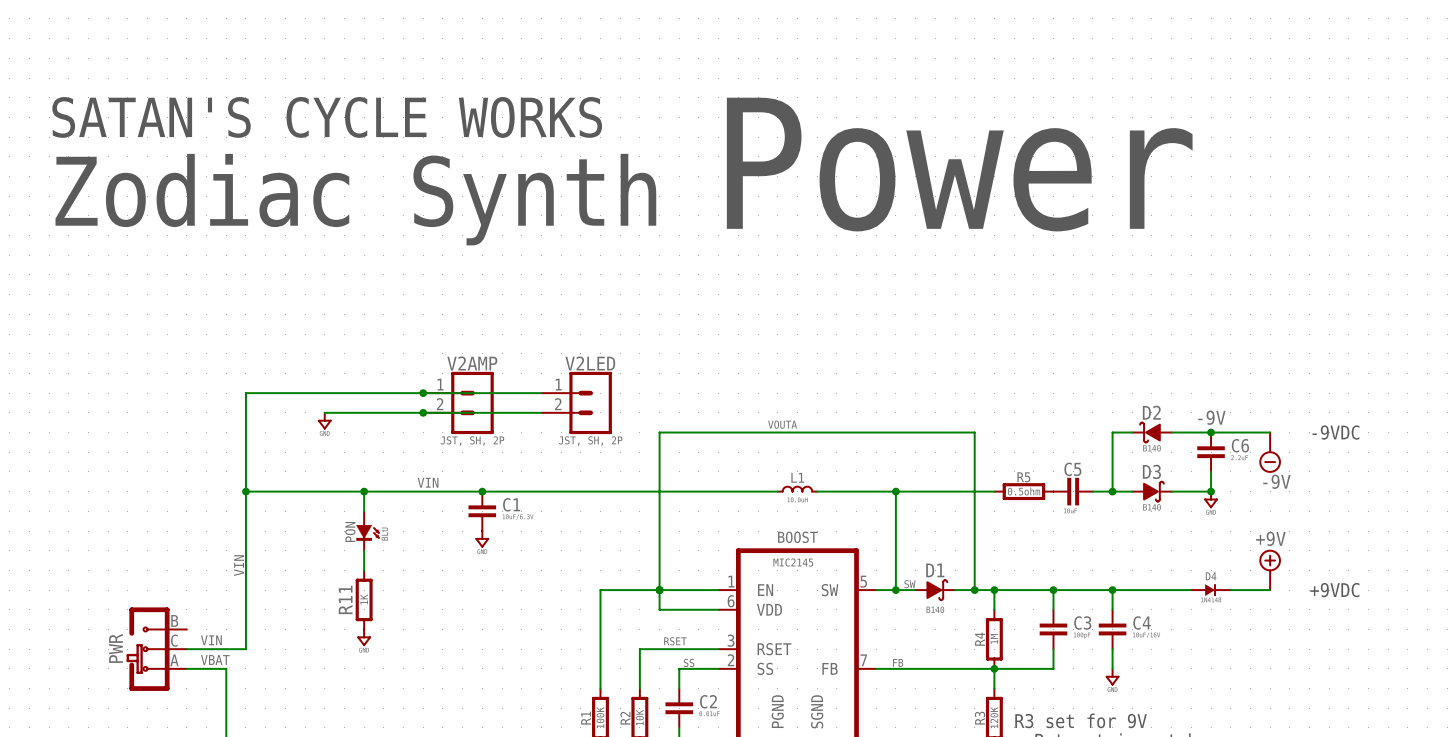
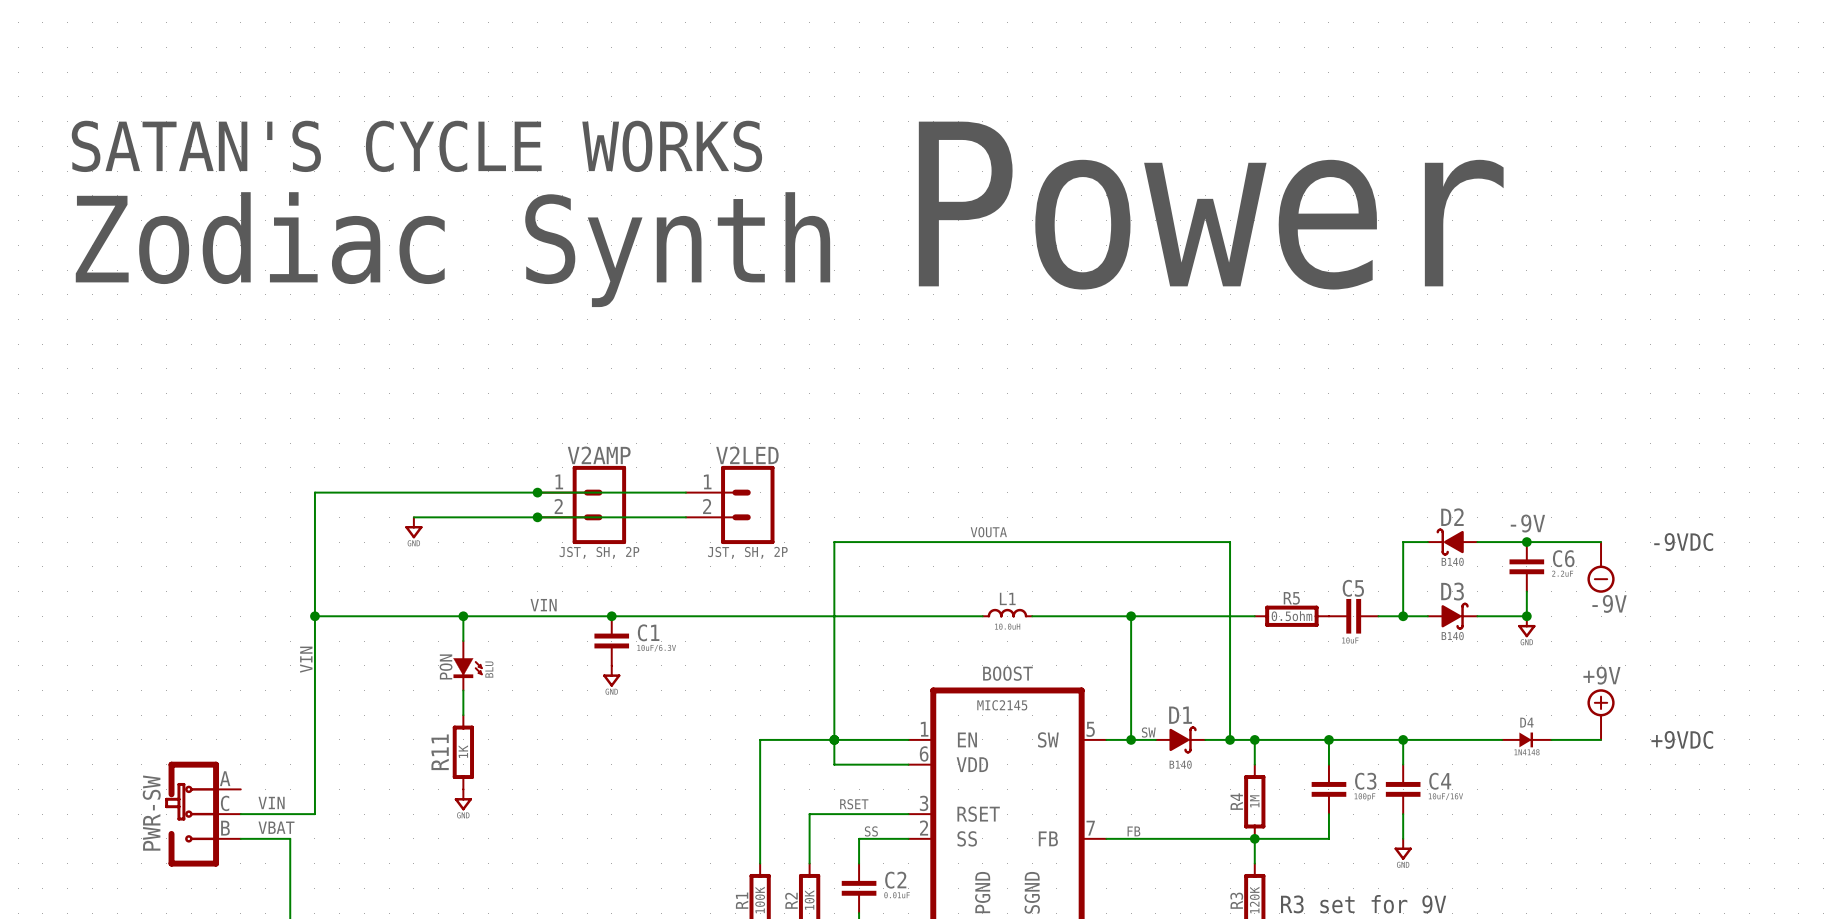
label position: VIN (239, 565) -> VIN (306, 659)
PWR: (156, 649) -> none
PWR-SW: none -> (202, 814)

